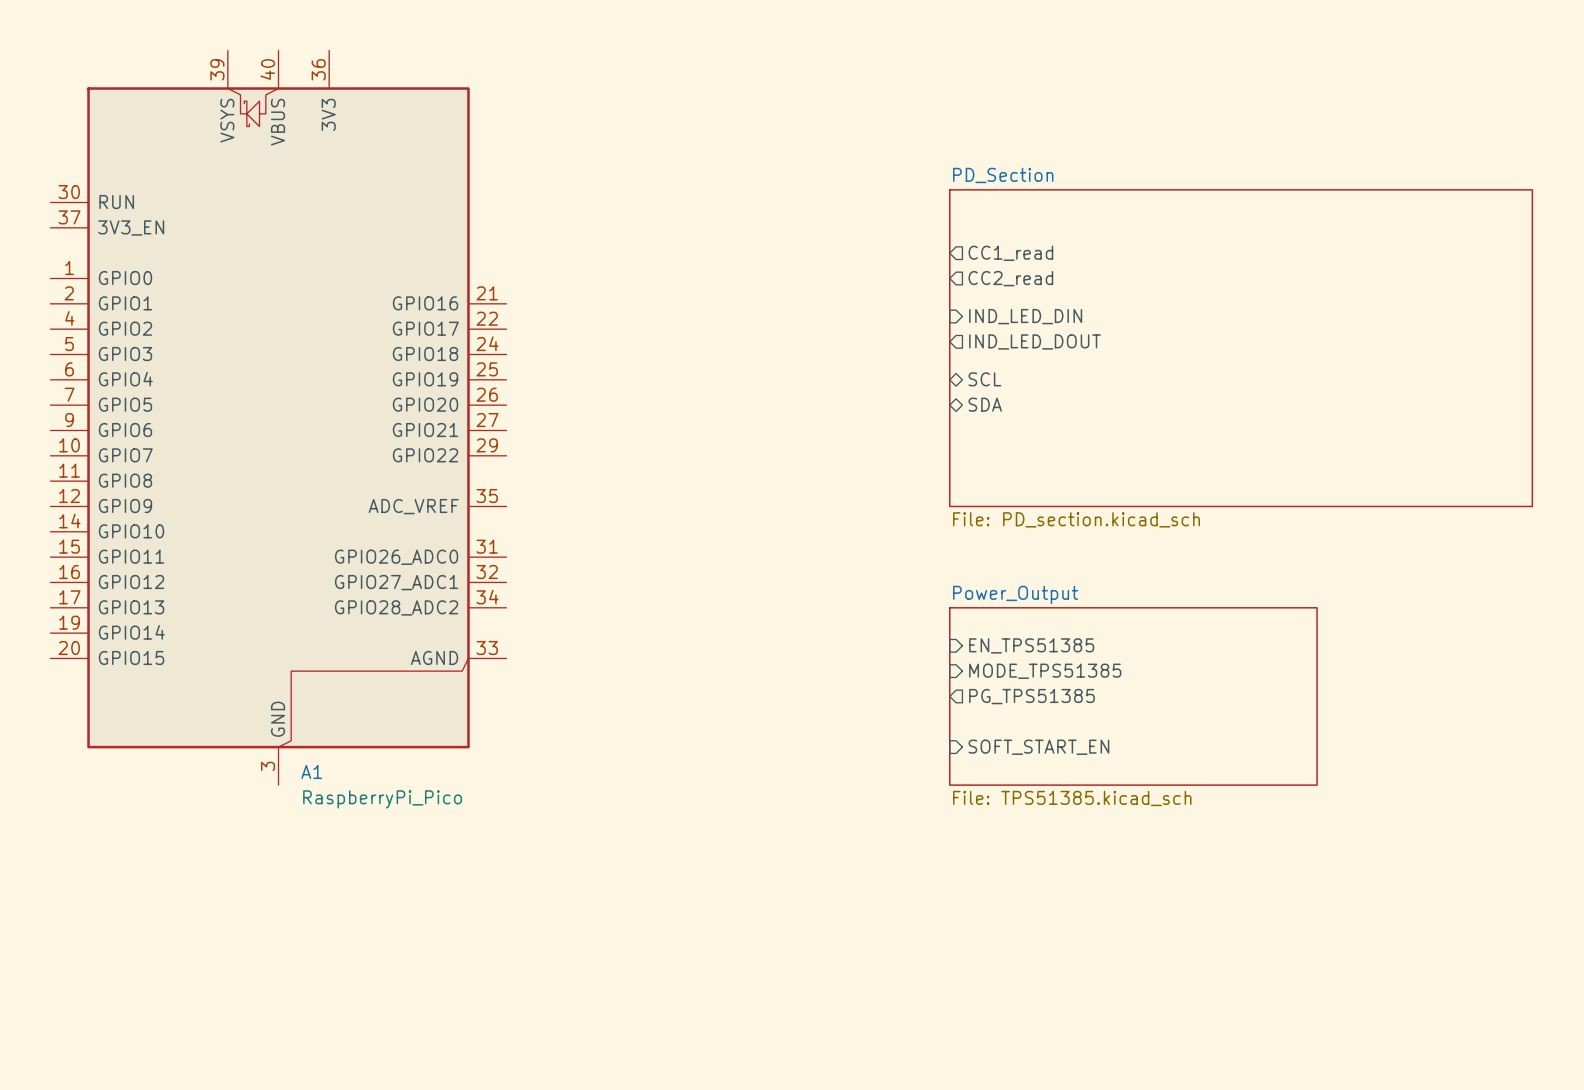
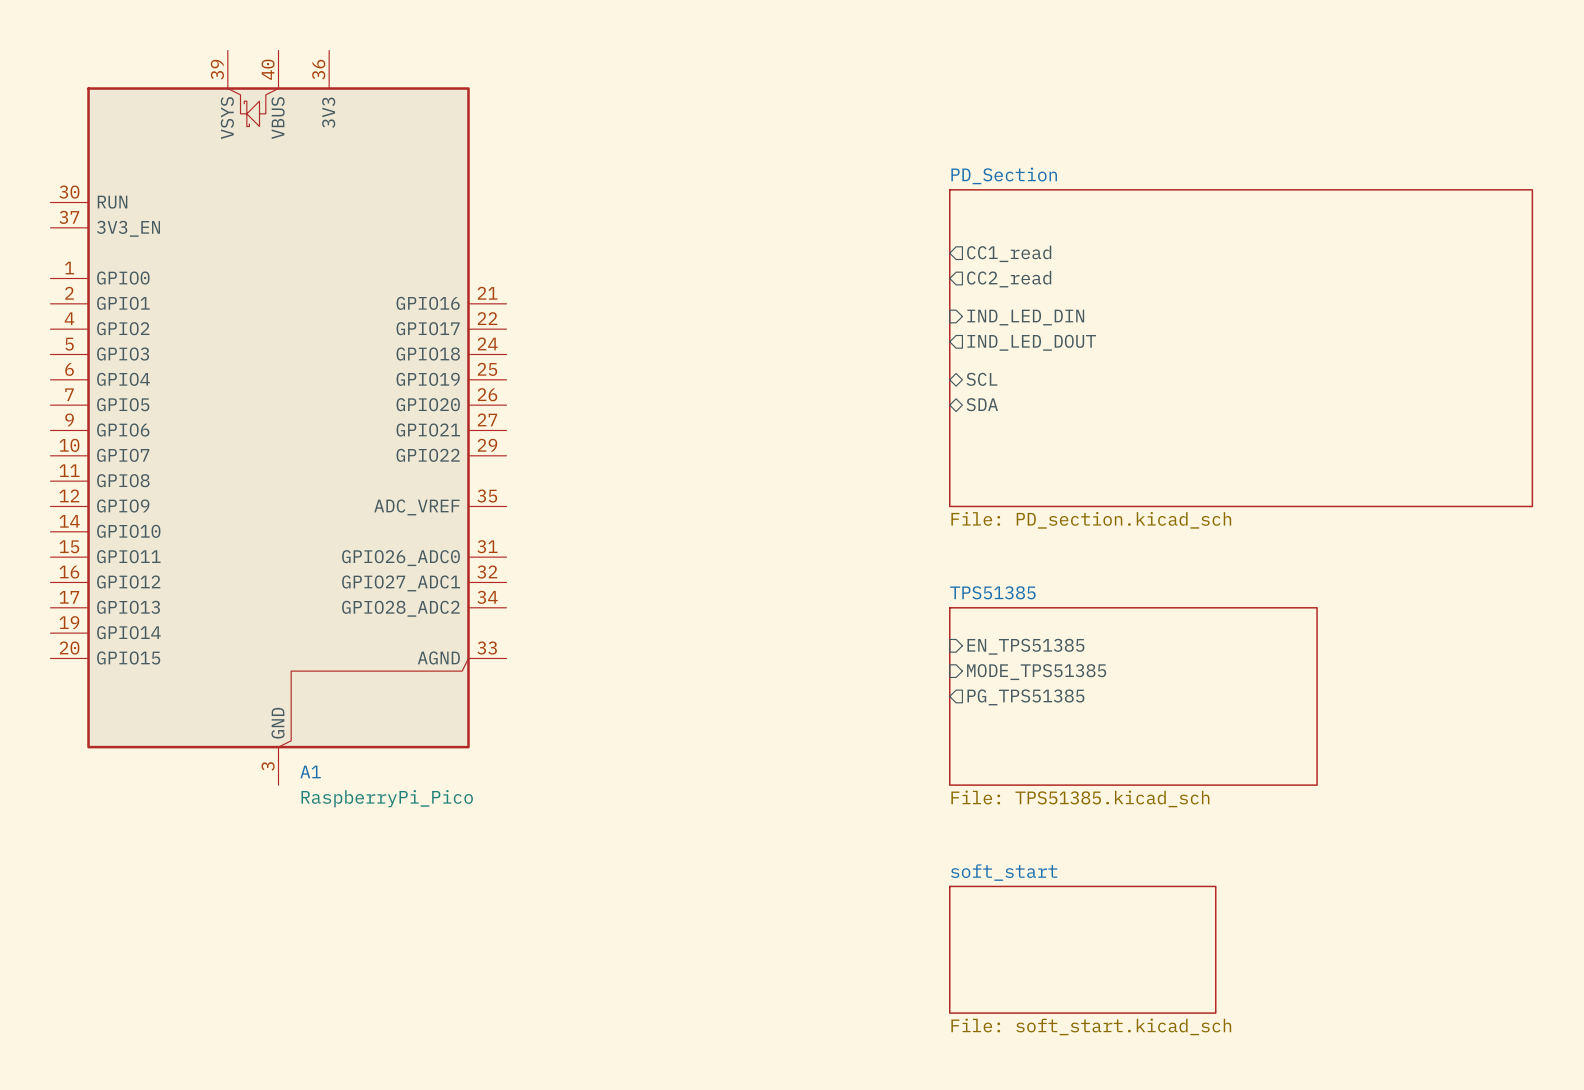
sheet Power_Output name: Power_Output (1015, 594) -> TPS51385 (992, 592)
sheet pin: SOFT_START_EN (1038, 747) -> none
sheet soft_start: none -> File: soft_start.kicad_sch (1082, 949)

